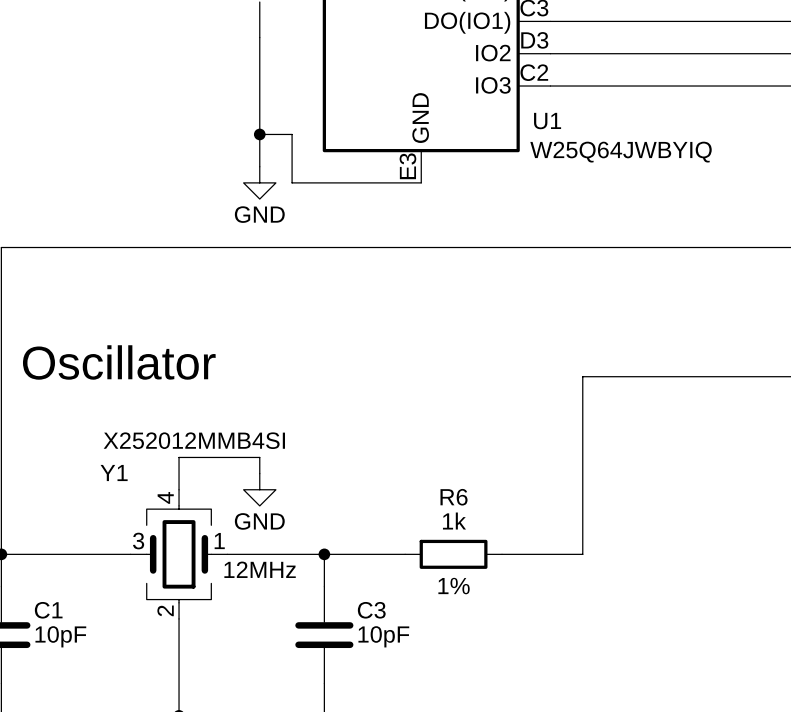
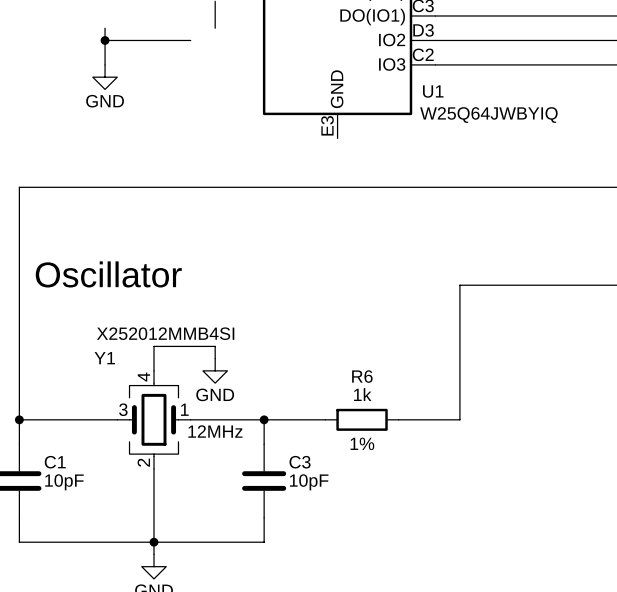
wire: none -> (105, 28) (105, 64)
wire: (259, 37) (259, 166) -> none
wire: none -> (105, 40) (190, 40)
junction: none -> (105, 40)
wire: (259, 134) (292, 134) (292, 182) (421, 182) -> none
junction: (259, 134) -> none
power symbol position: GND (259, 182) -> GND (105, 77)

